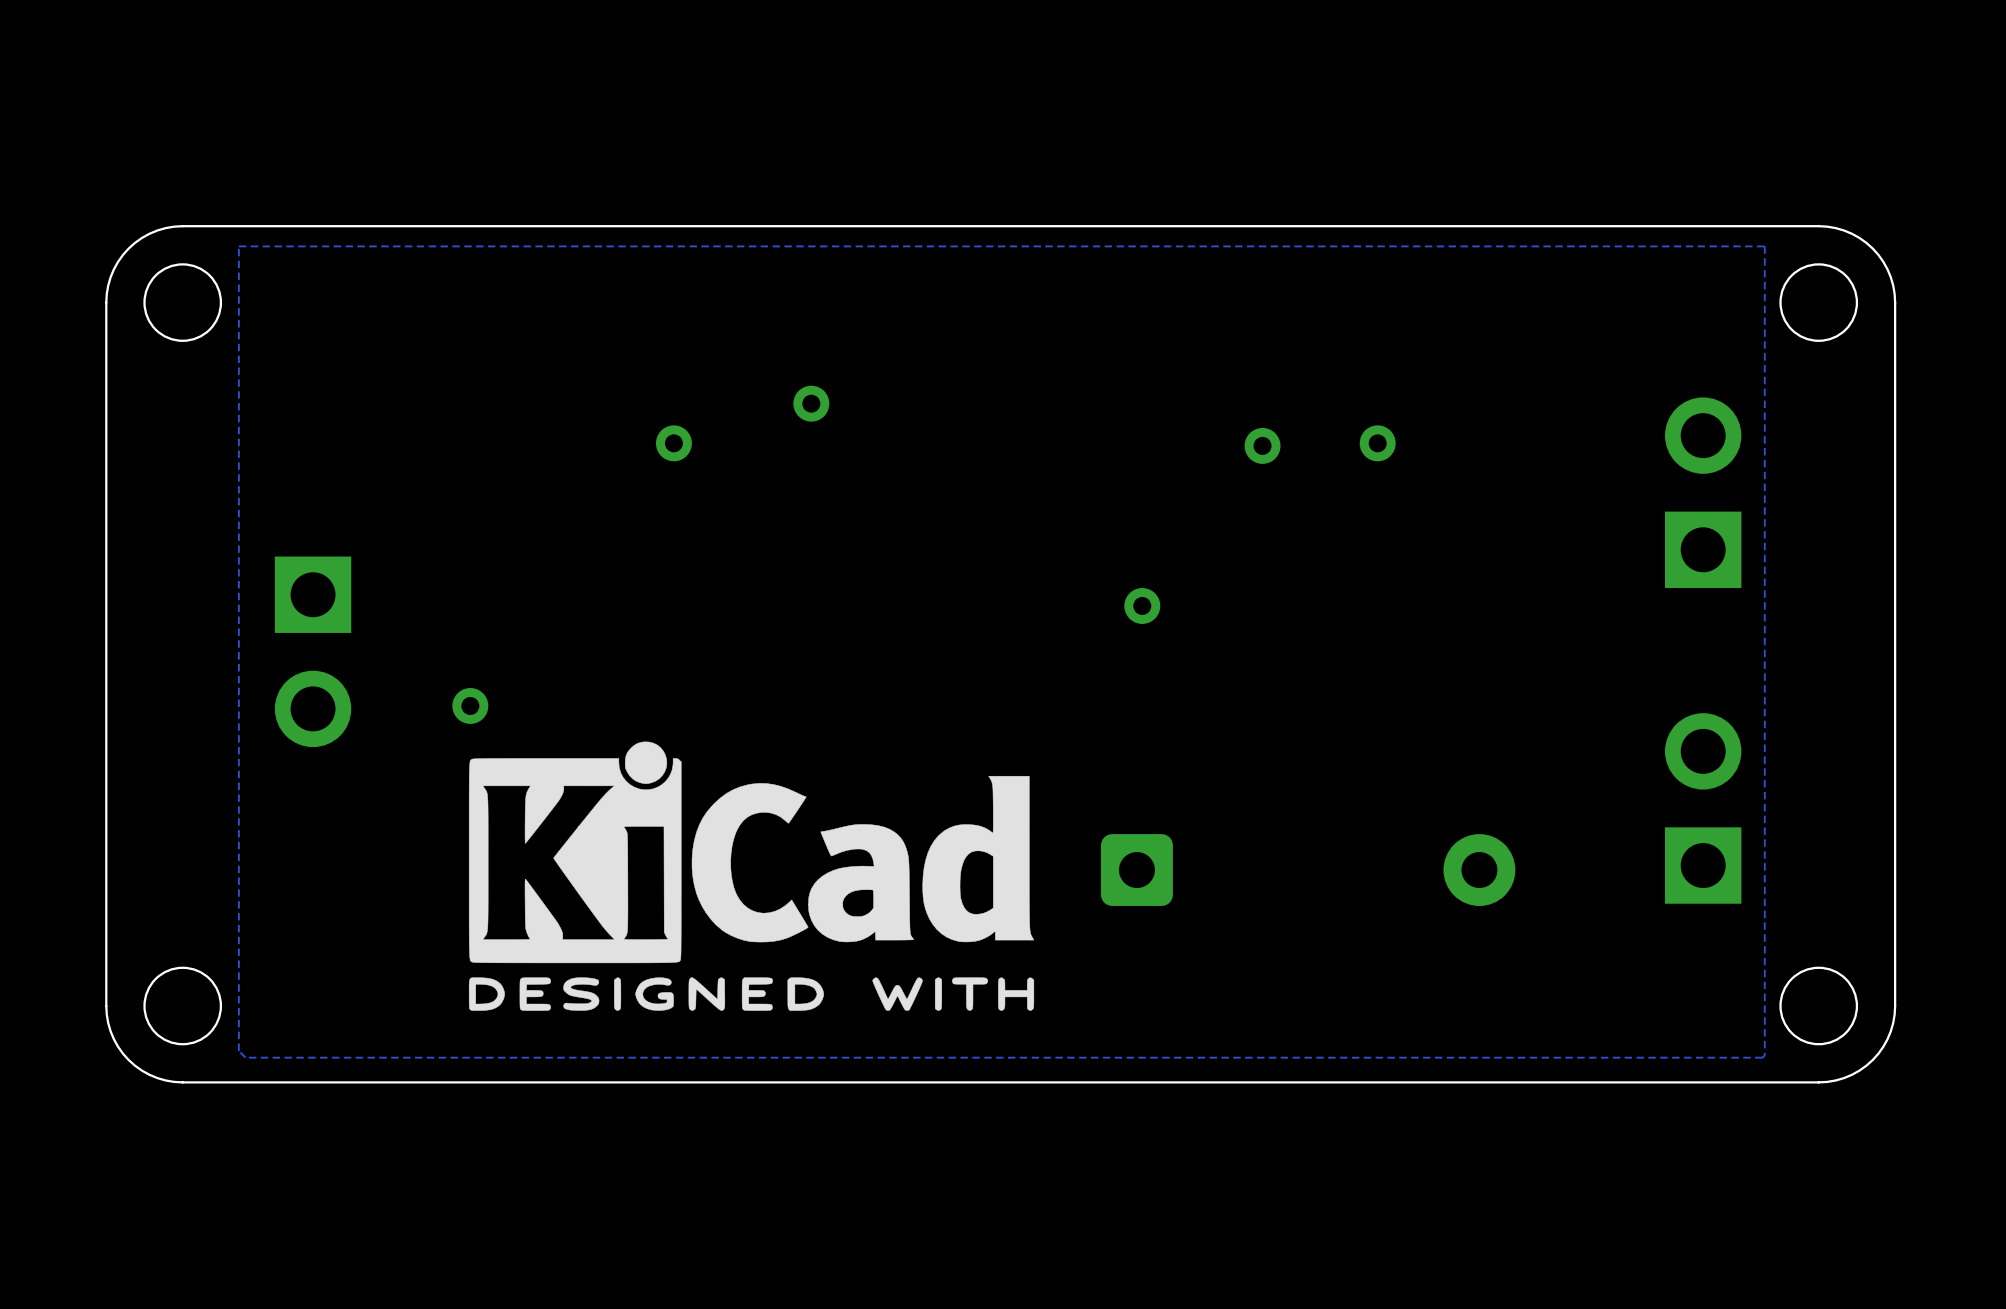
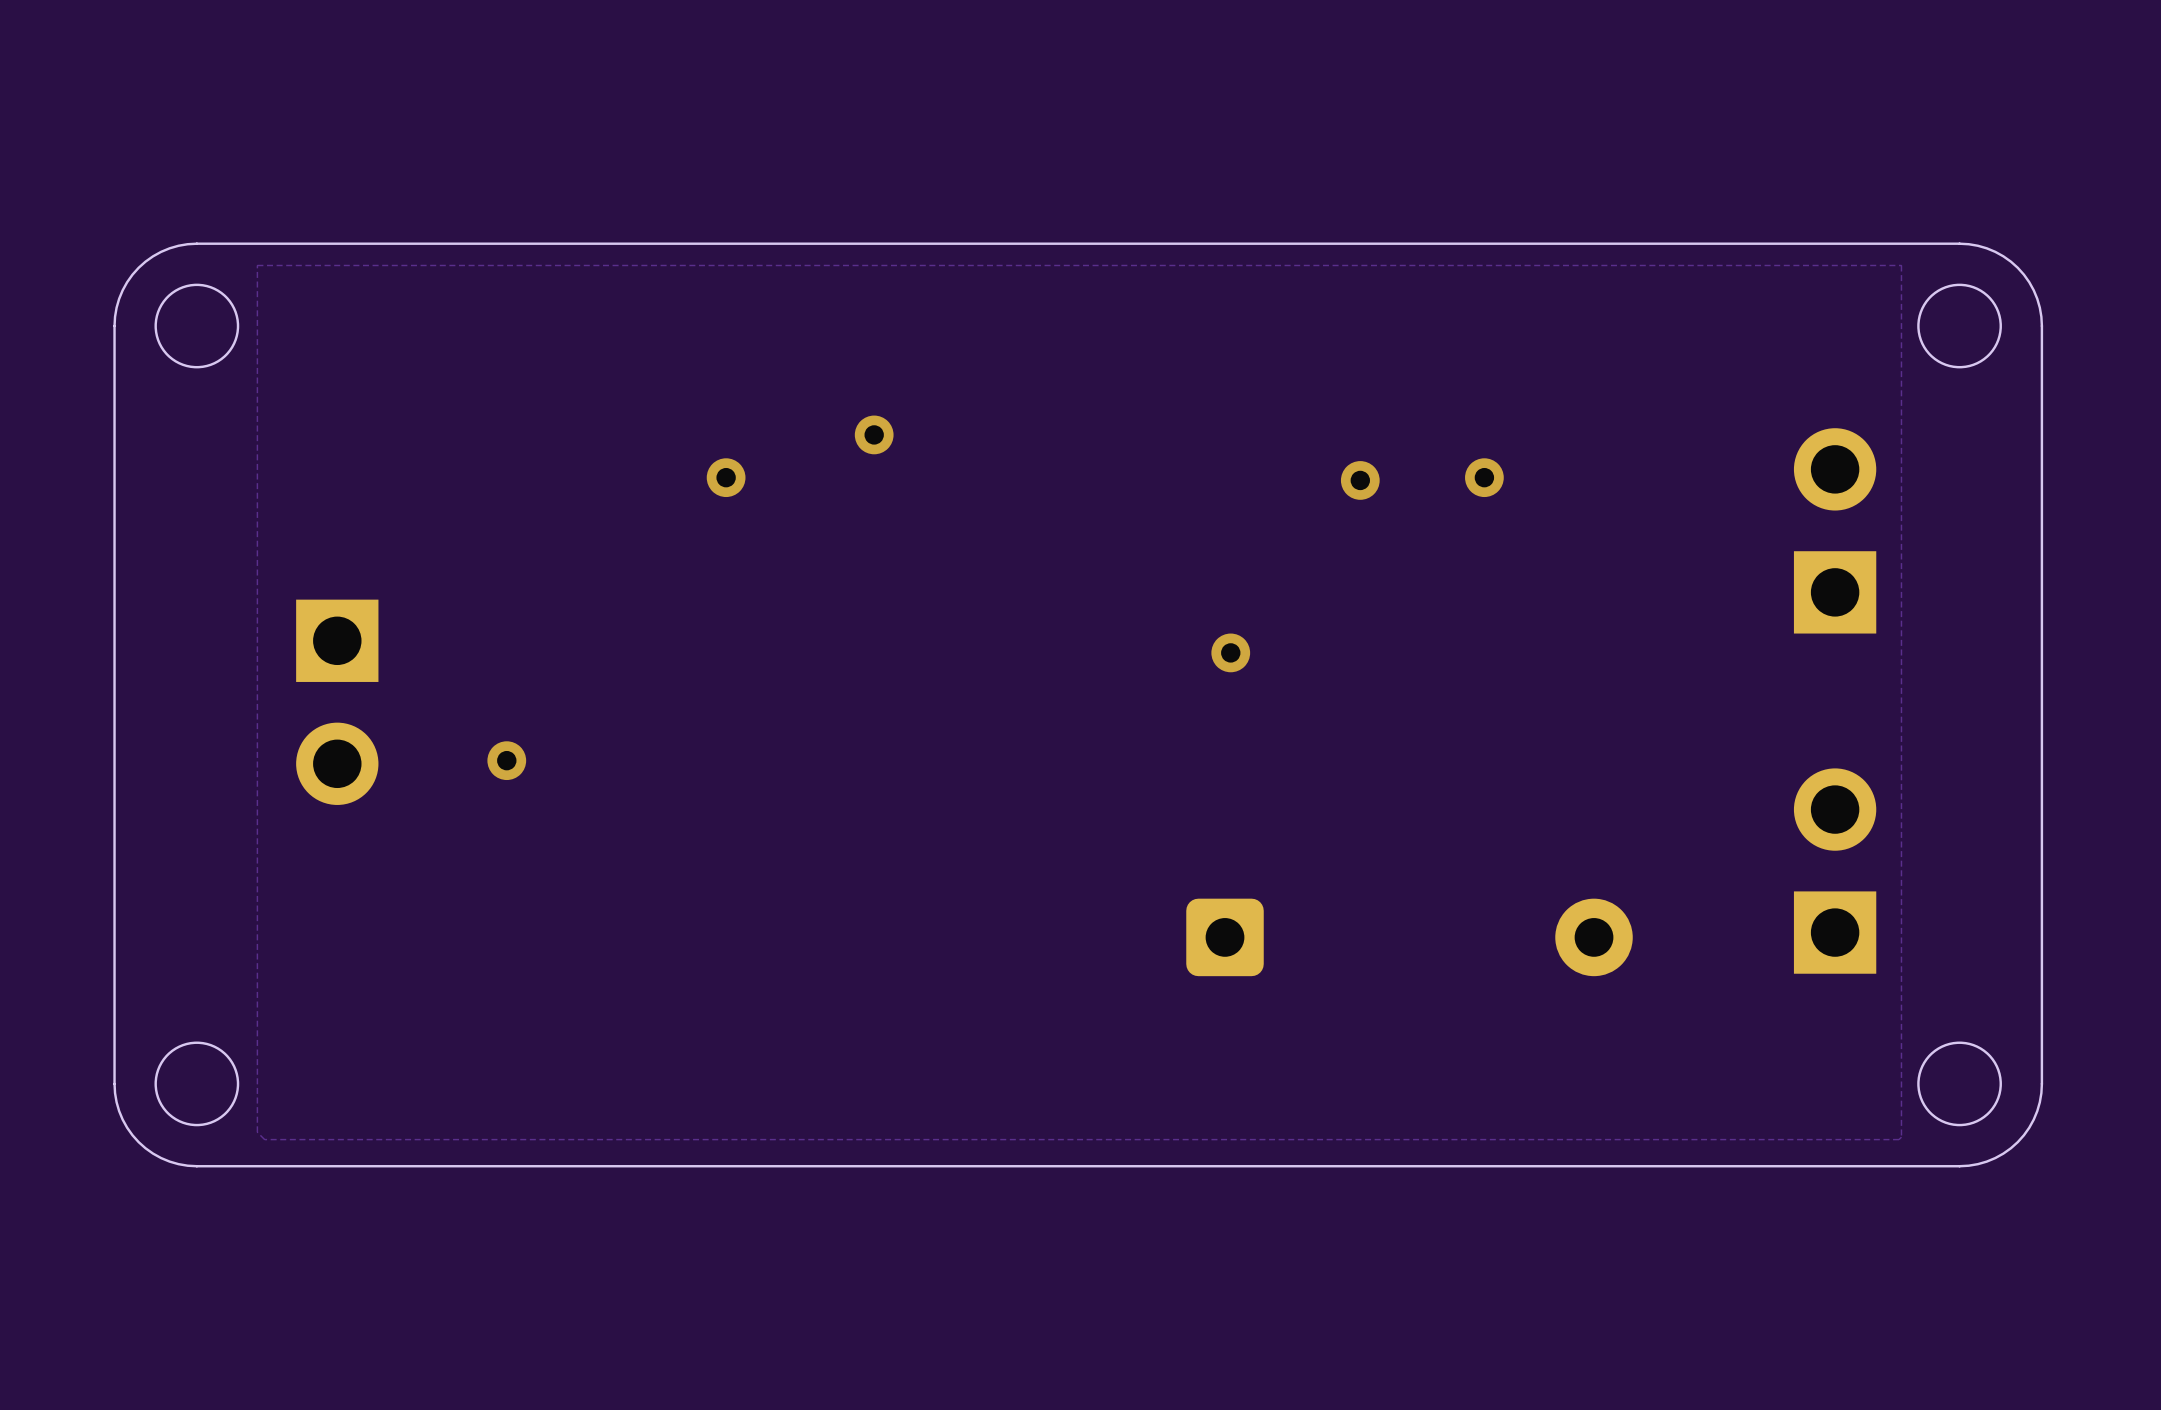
drawing: [468, 741, 1035, 1011] -> none

